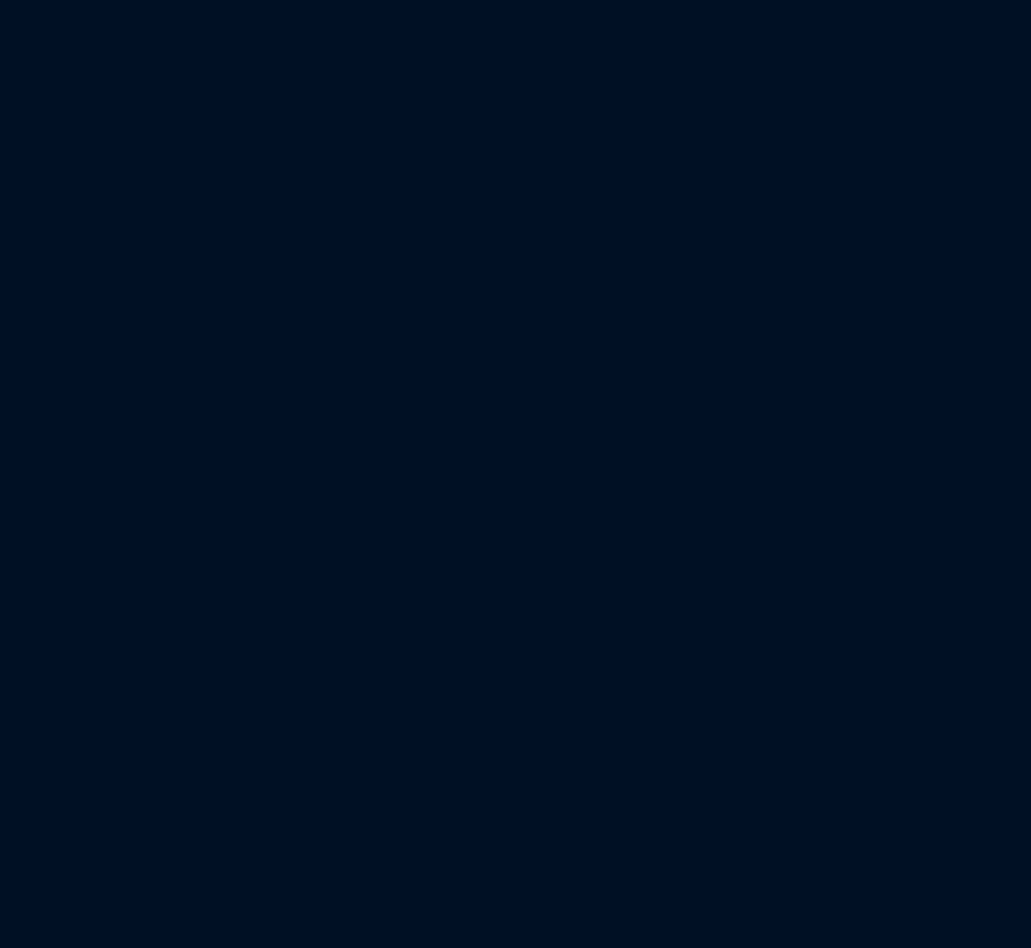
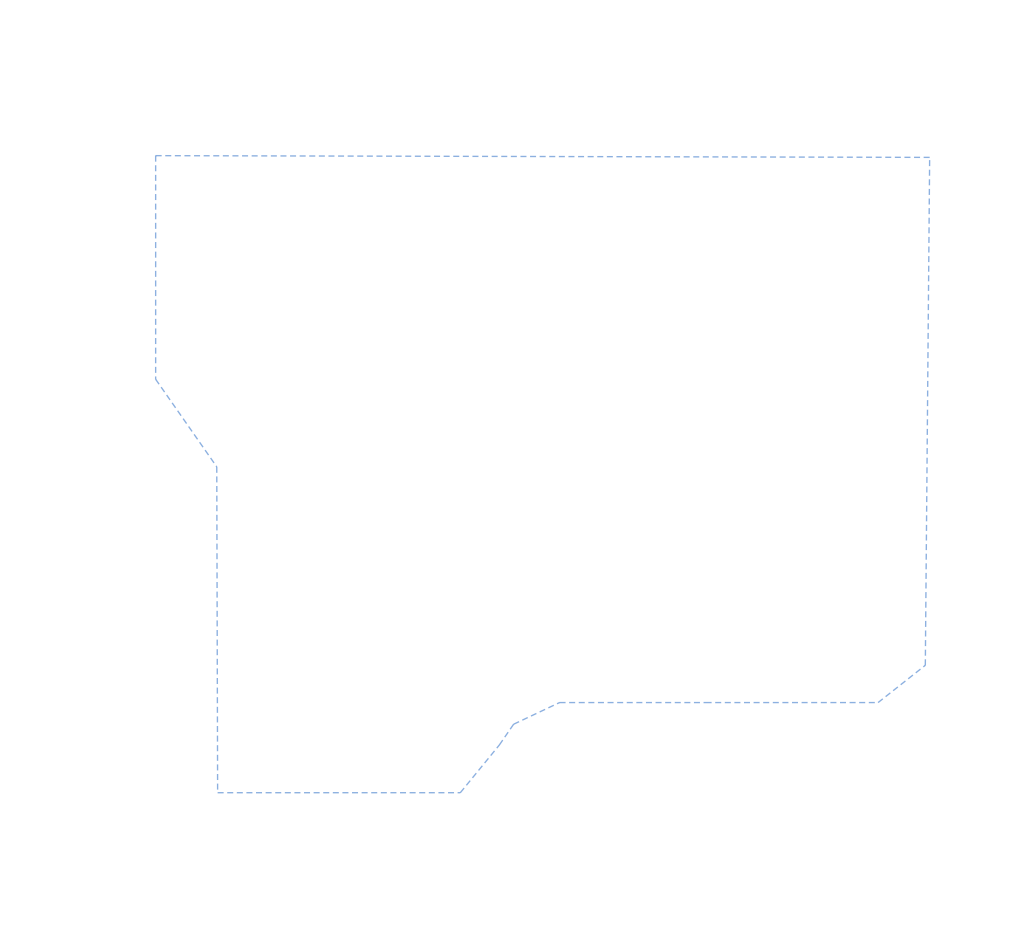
bottom zone outline: none -> (155, 155) (929, 157) (925, 665) (878, 702) (559, 702) (513, 724) (460, 792) (217, 792) (216, 466) (155, 379) (155, 155)

